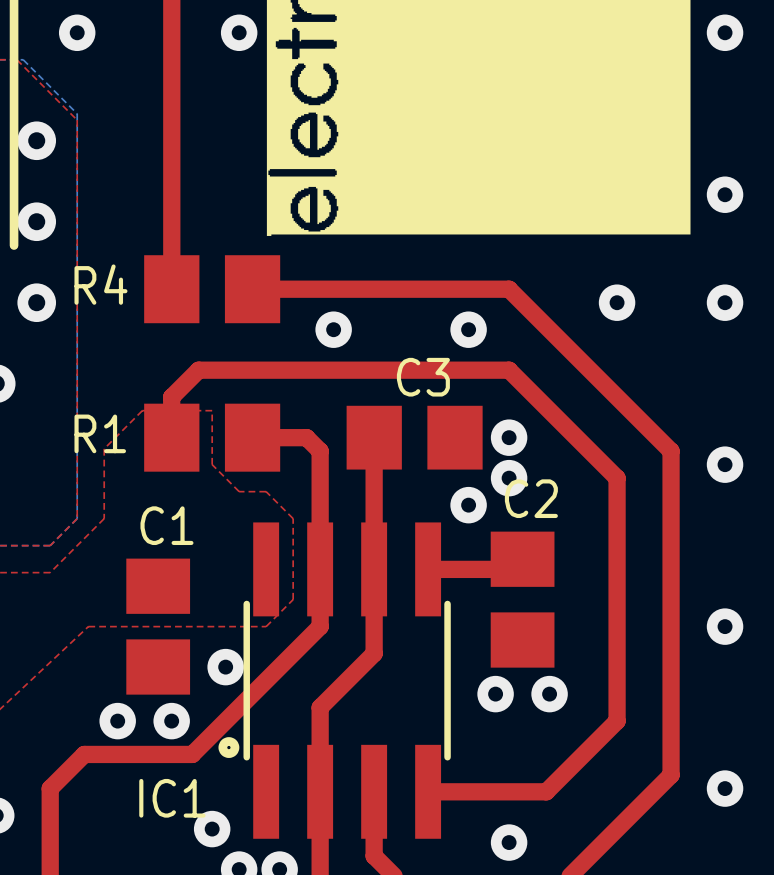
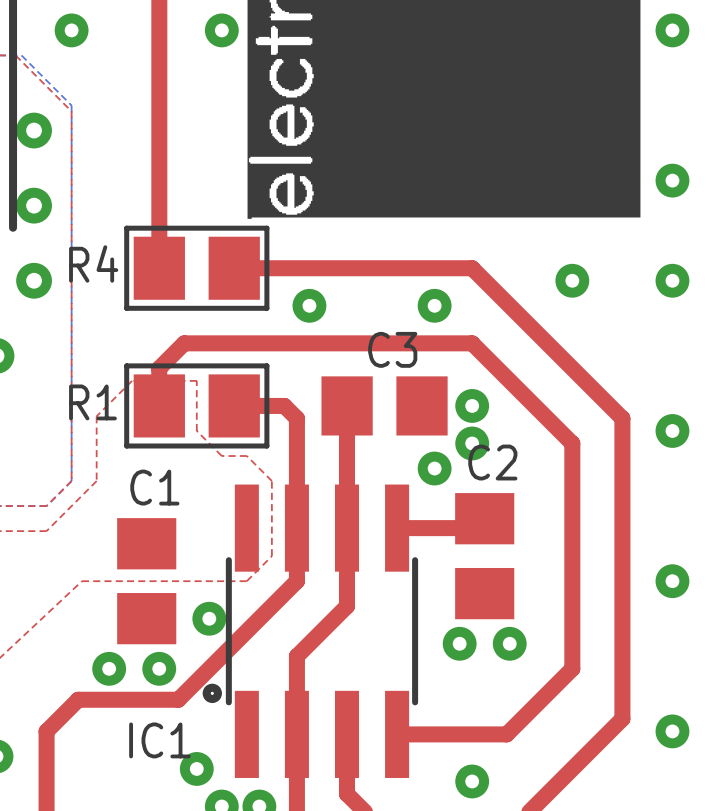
R4 footprint: [144, 255, 281, 324] -> [124, 225, 270, 311]
R1 footprint: [144, 403, 281, 472] -> [124, 363, 270, 449]

